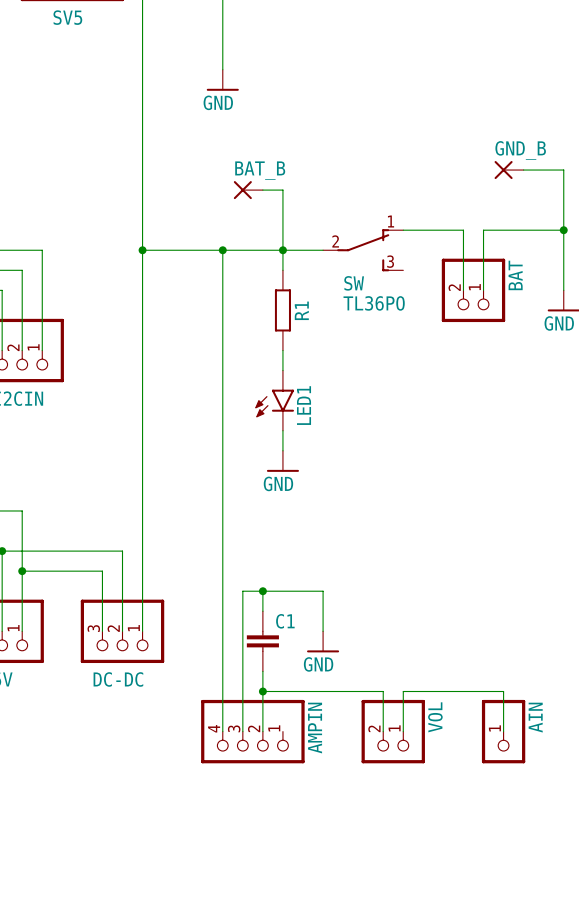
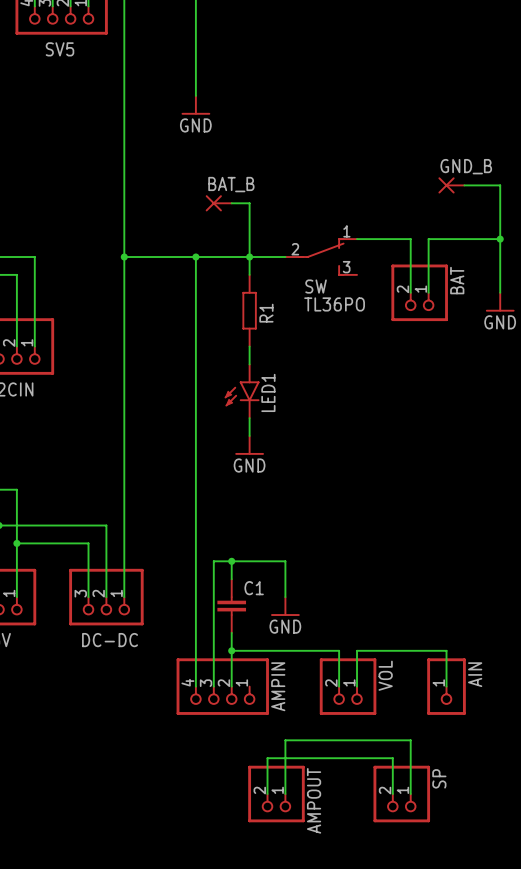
wire: none -> (267, 794) (267, 758) (392, 758) (392, 794)
AMPOUT: none -> (276, 794)
wire: none -> (285, 794) (285, 740) (410, 740) (410, 794)
SP: none -> (401, 794)

